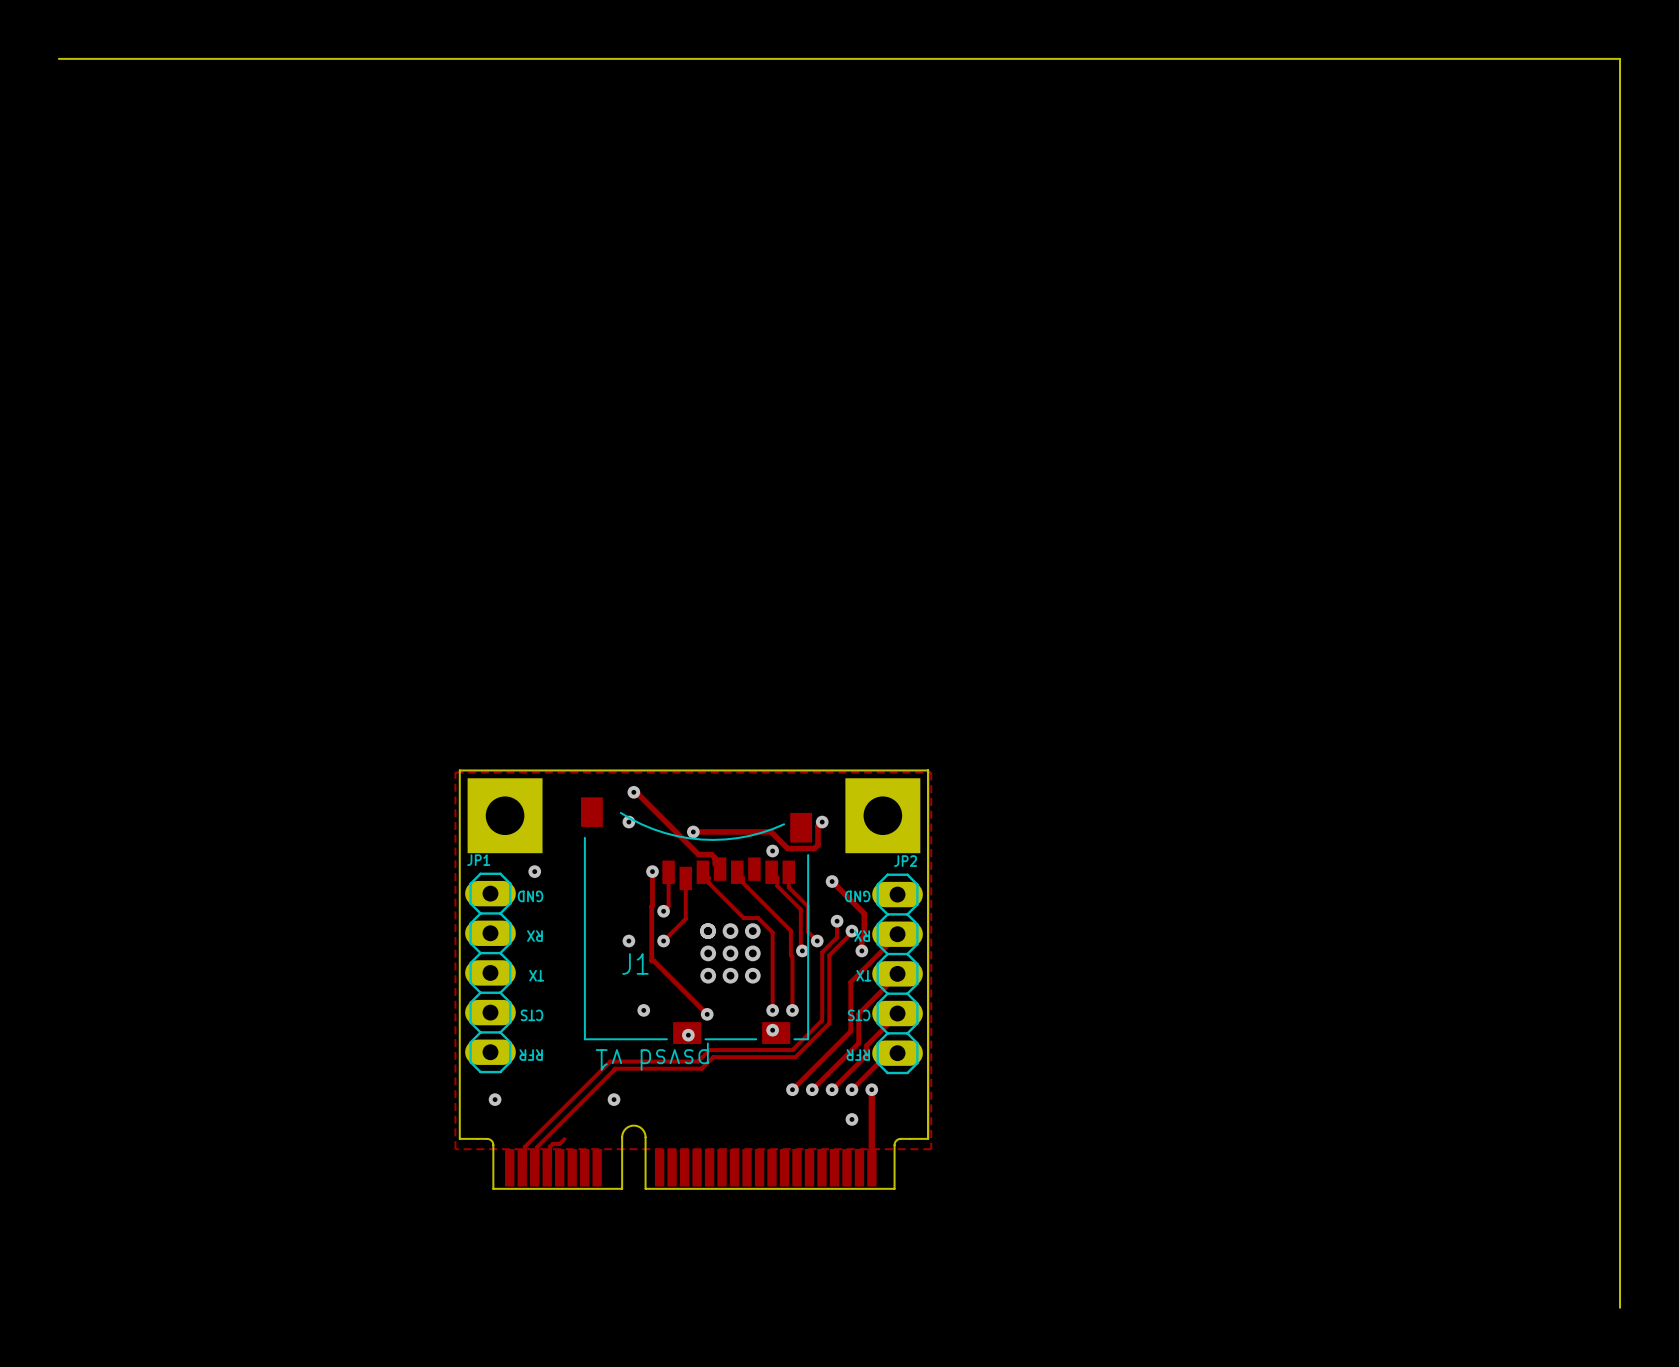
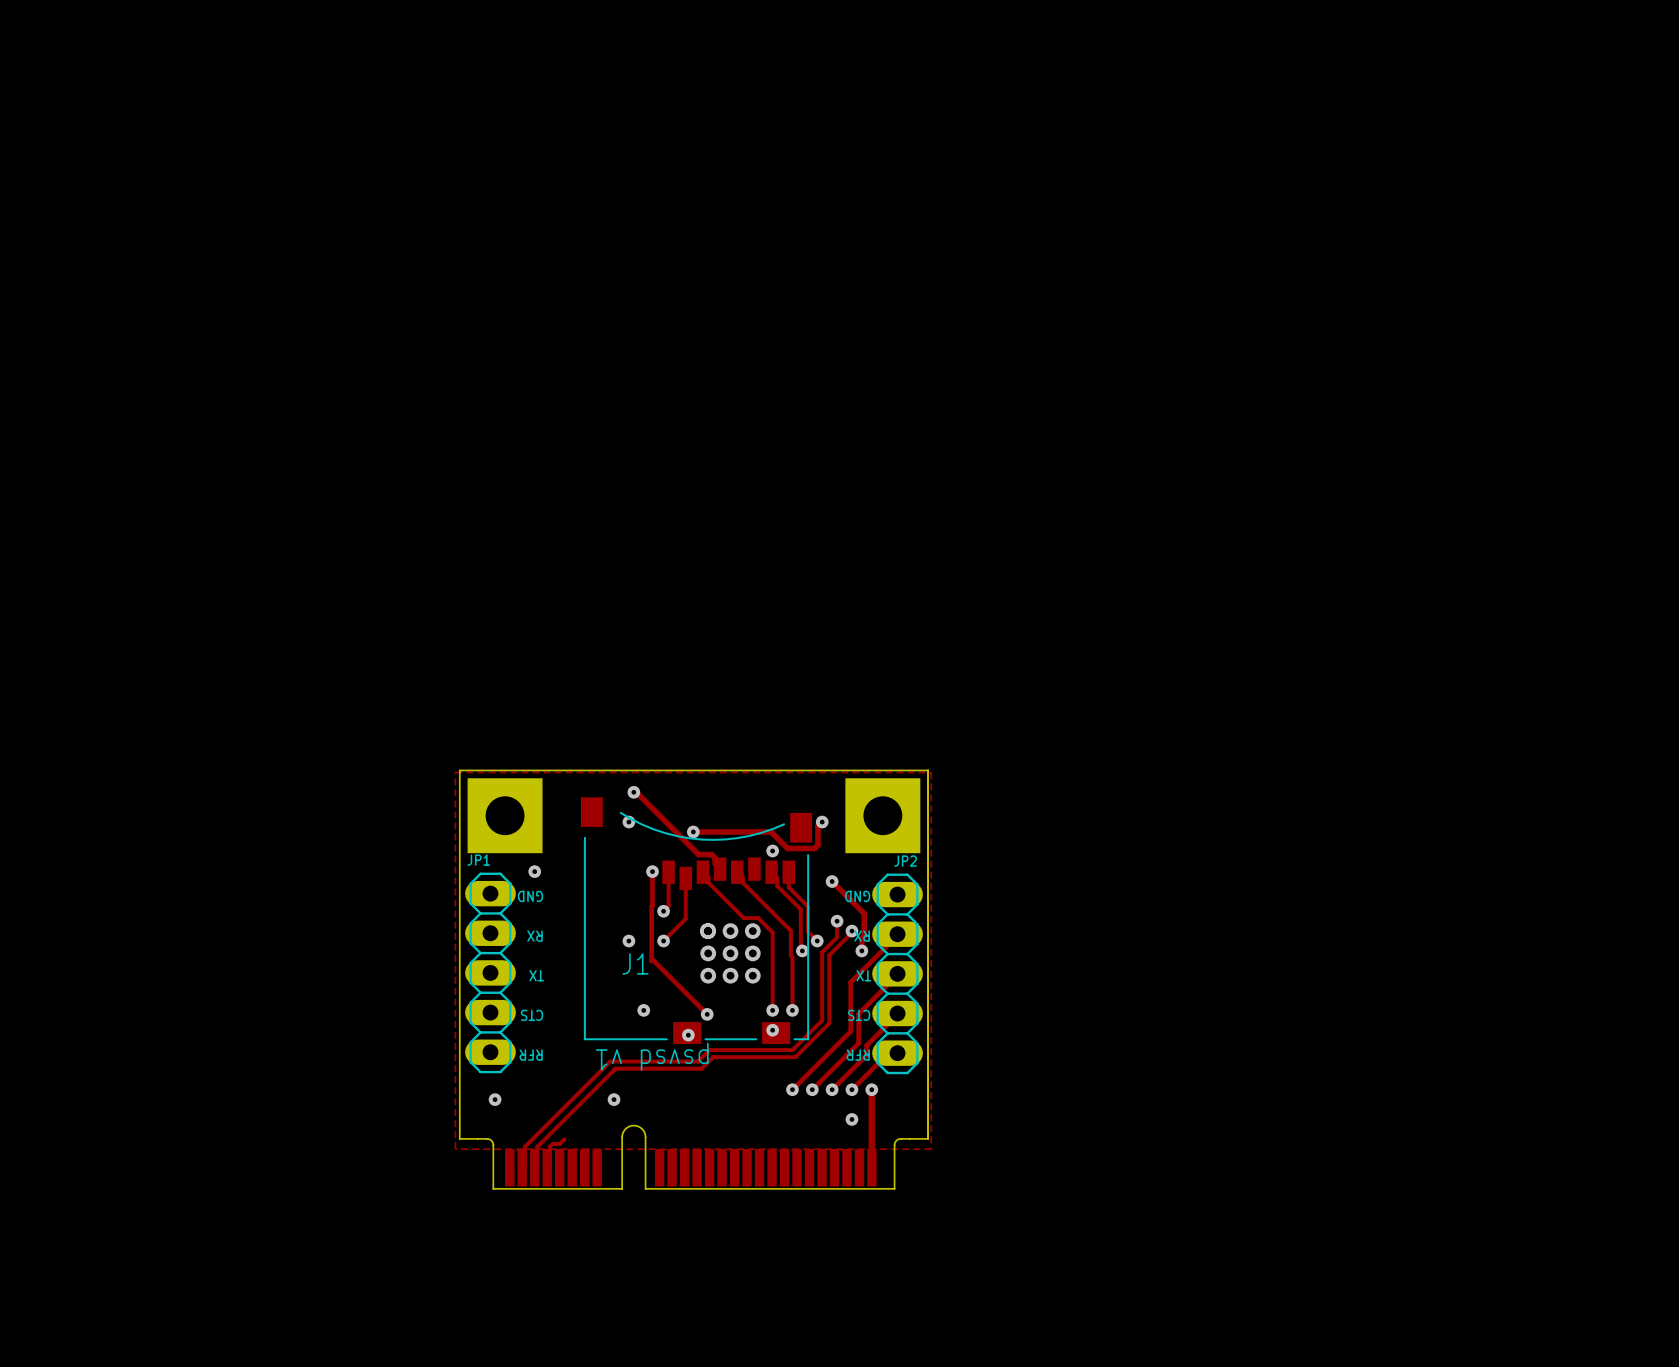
board edge: (58, 58) (1620, 58) (1620, 1307) -> none

